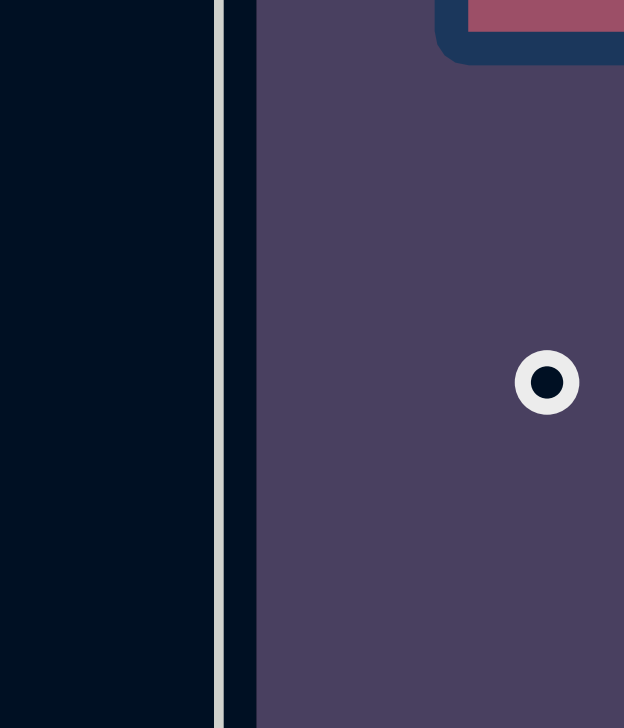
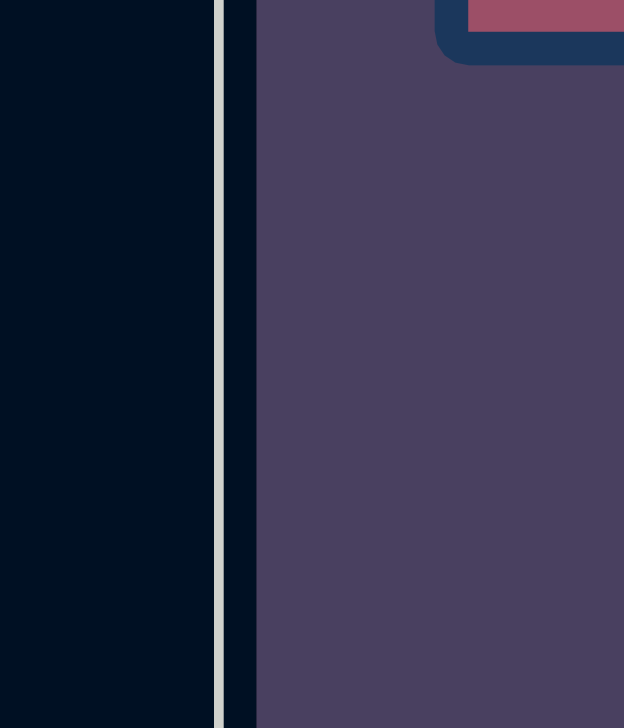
via: (547, 382) -> none

